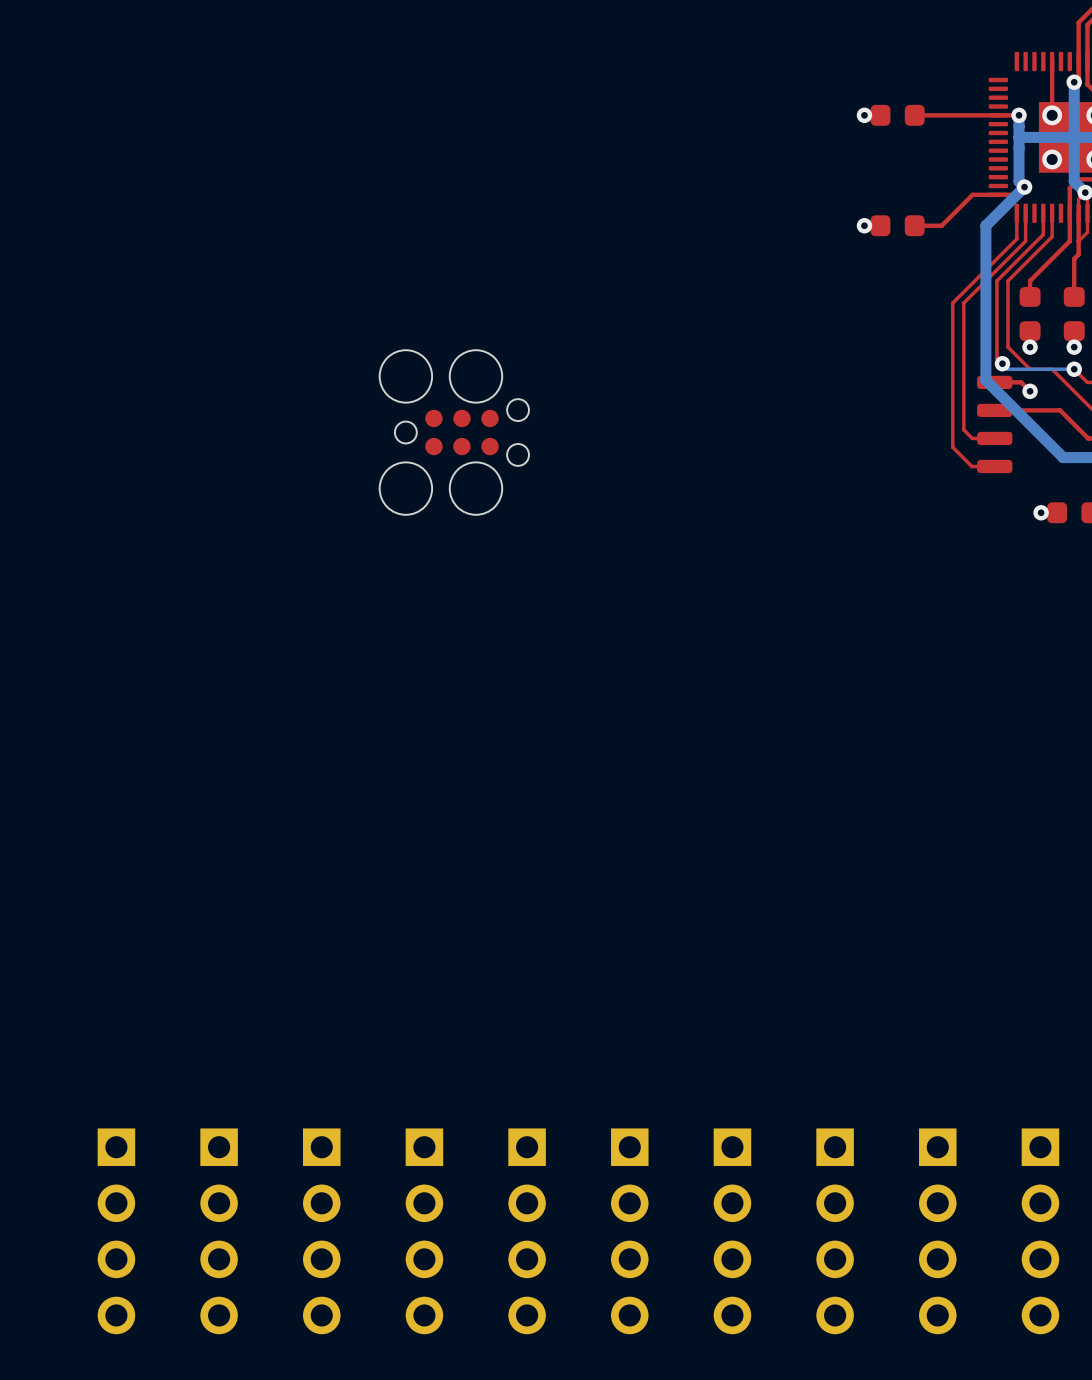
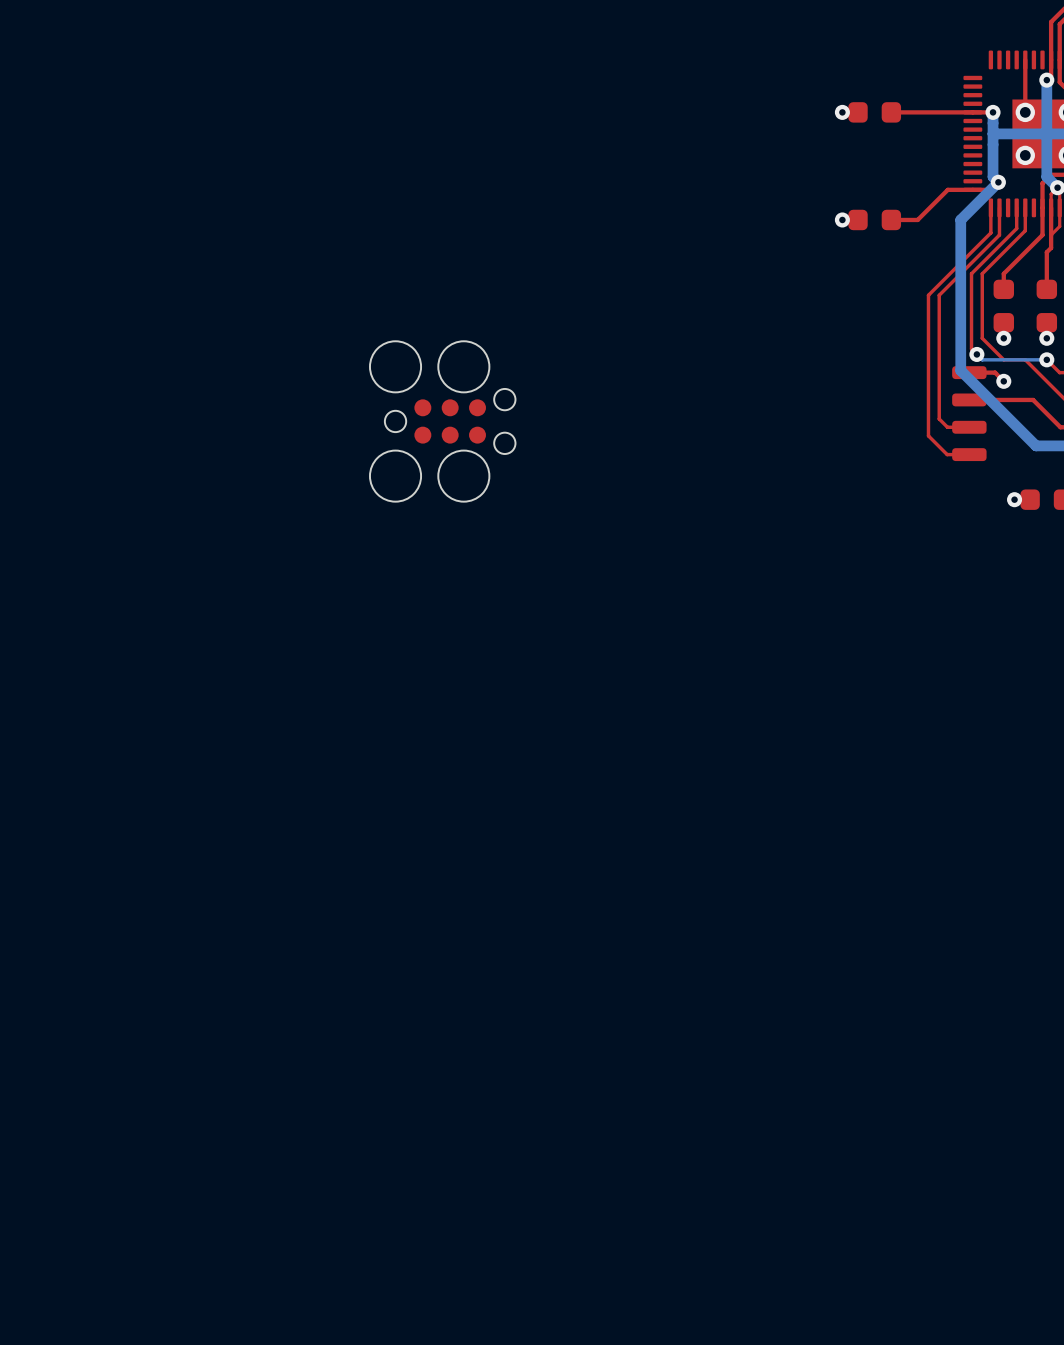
part: (116, 1231) -> none
part: (219, 1231) -> none
part: (321, 1231) -> none
part: (424, 1231) -> none
part: (527, 1231) -> none
part: (629, 1231) -> none
part: (732, 1231) -> none
part: (835, 1231) -> none
part: (937, 1231) -> none
part: (1040, 1231) -> none

